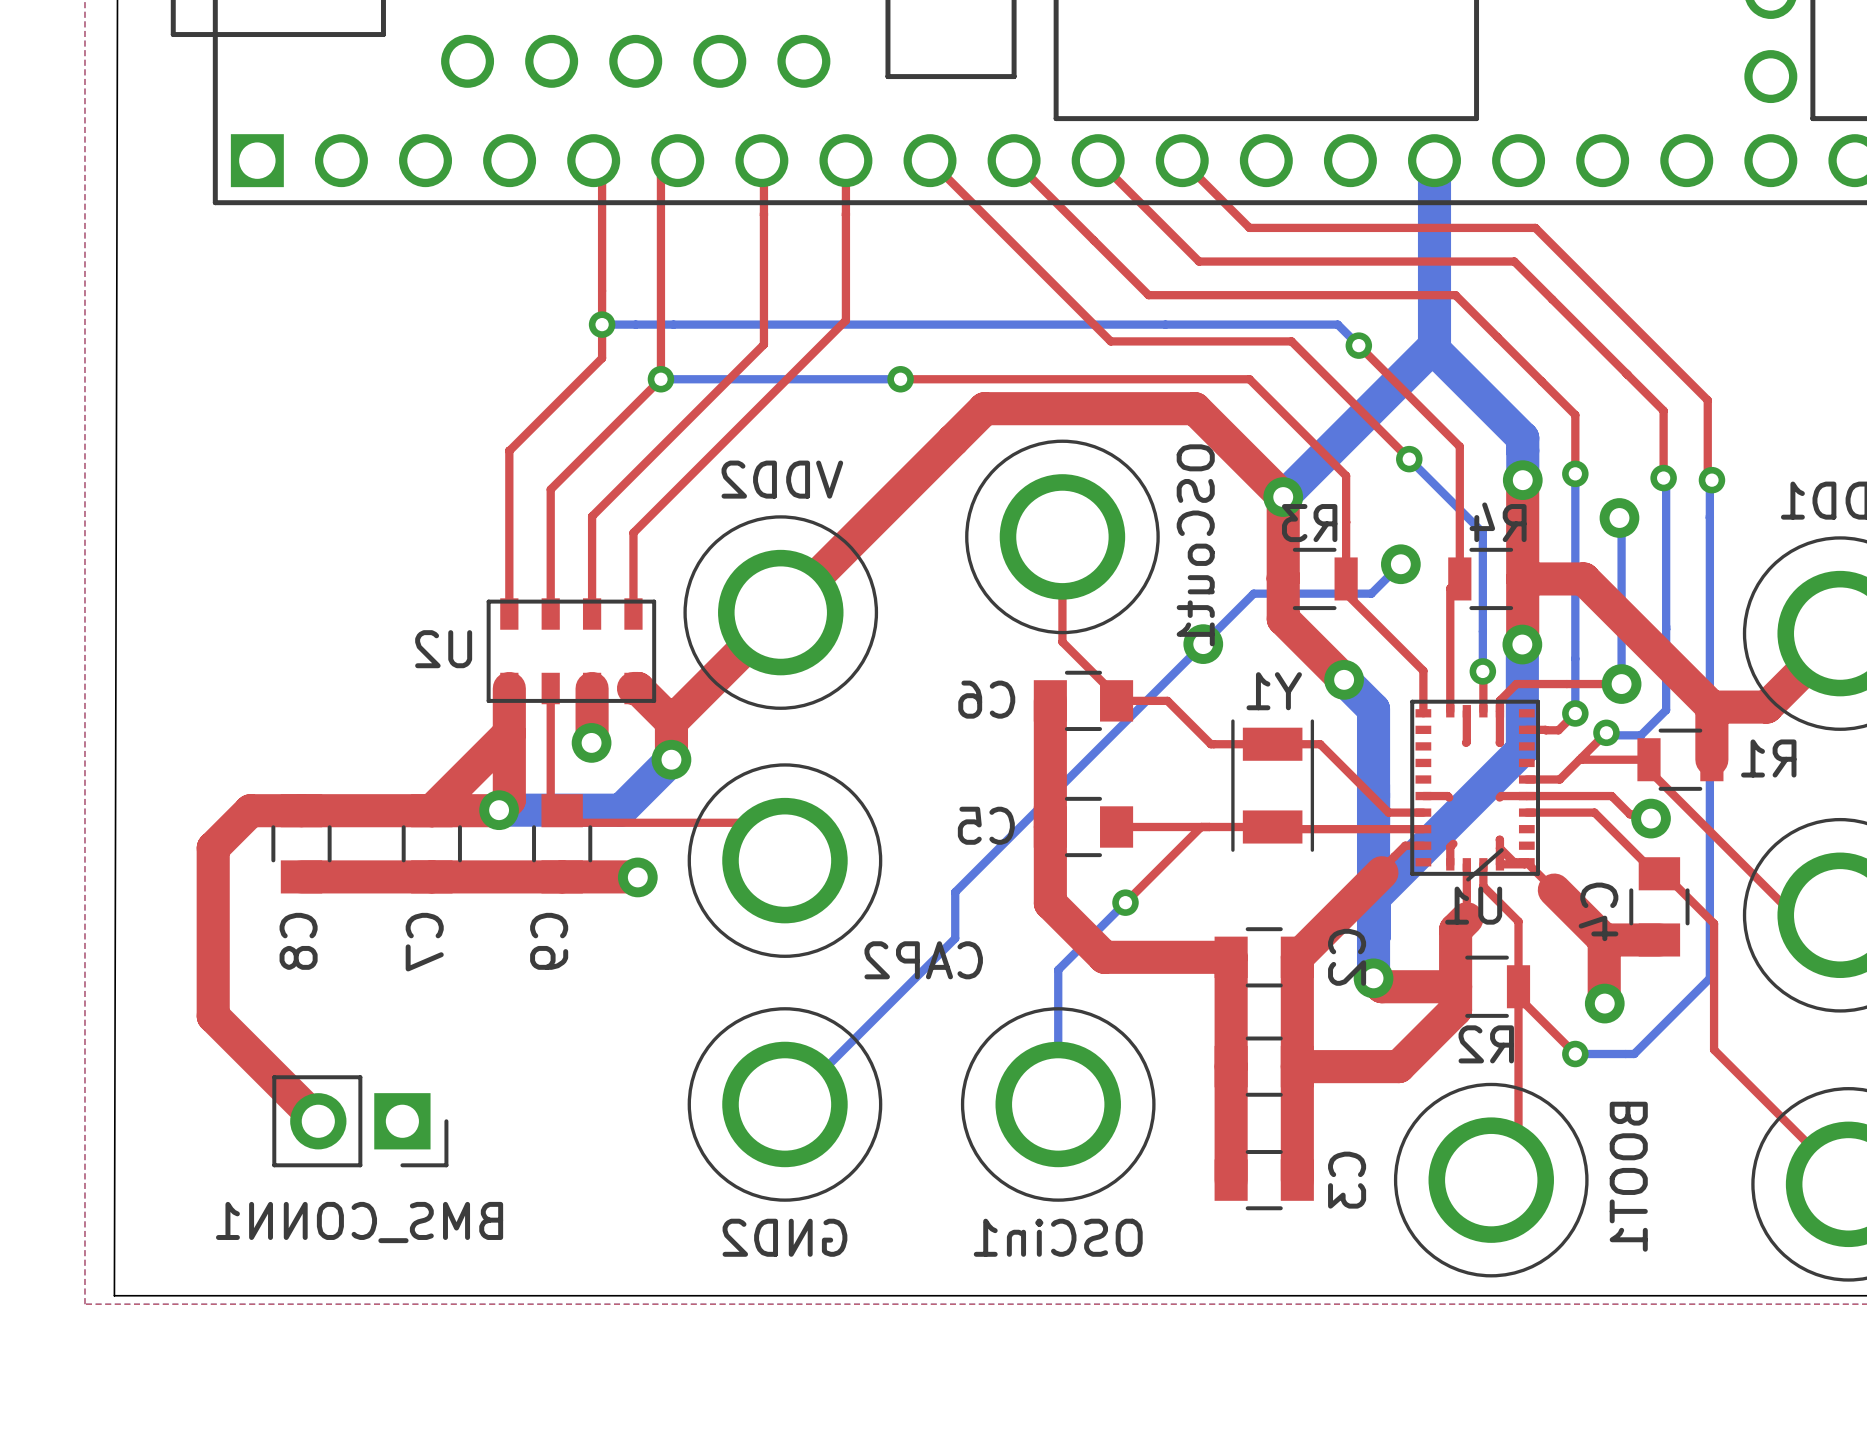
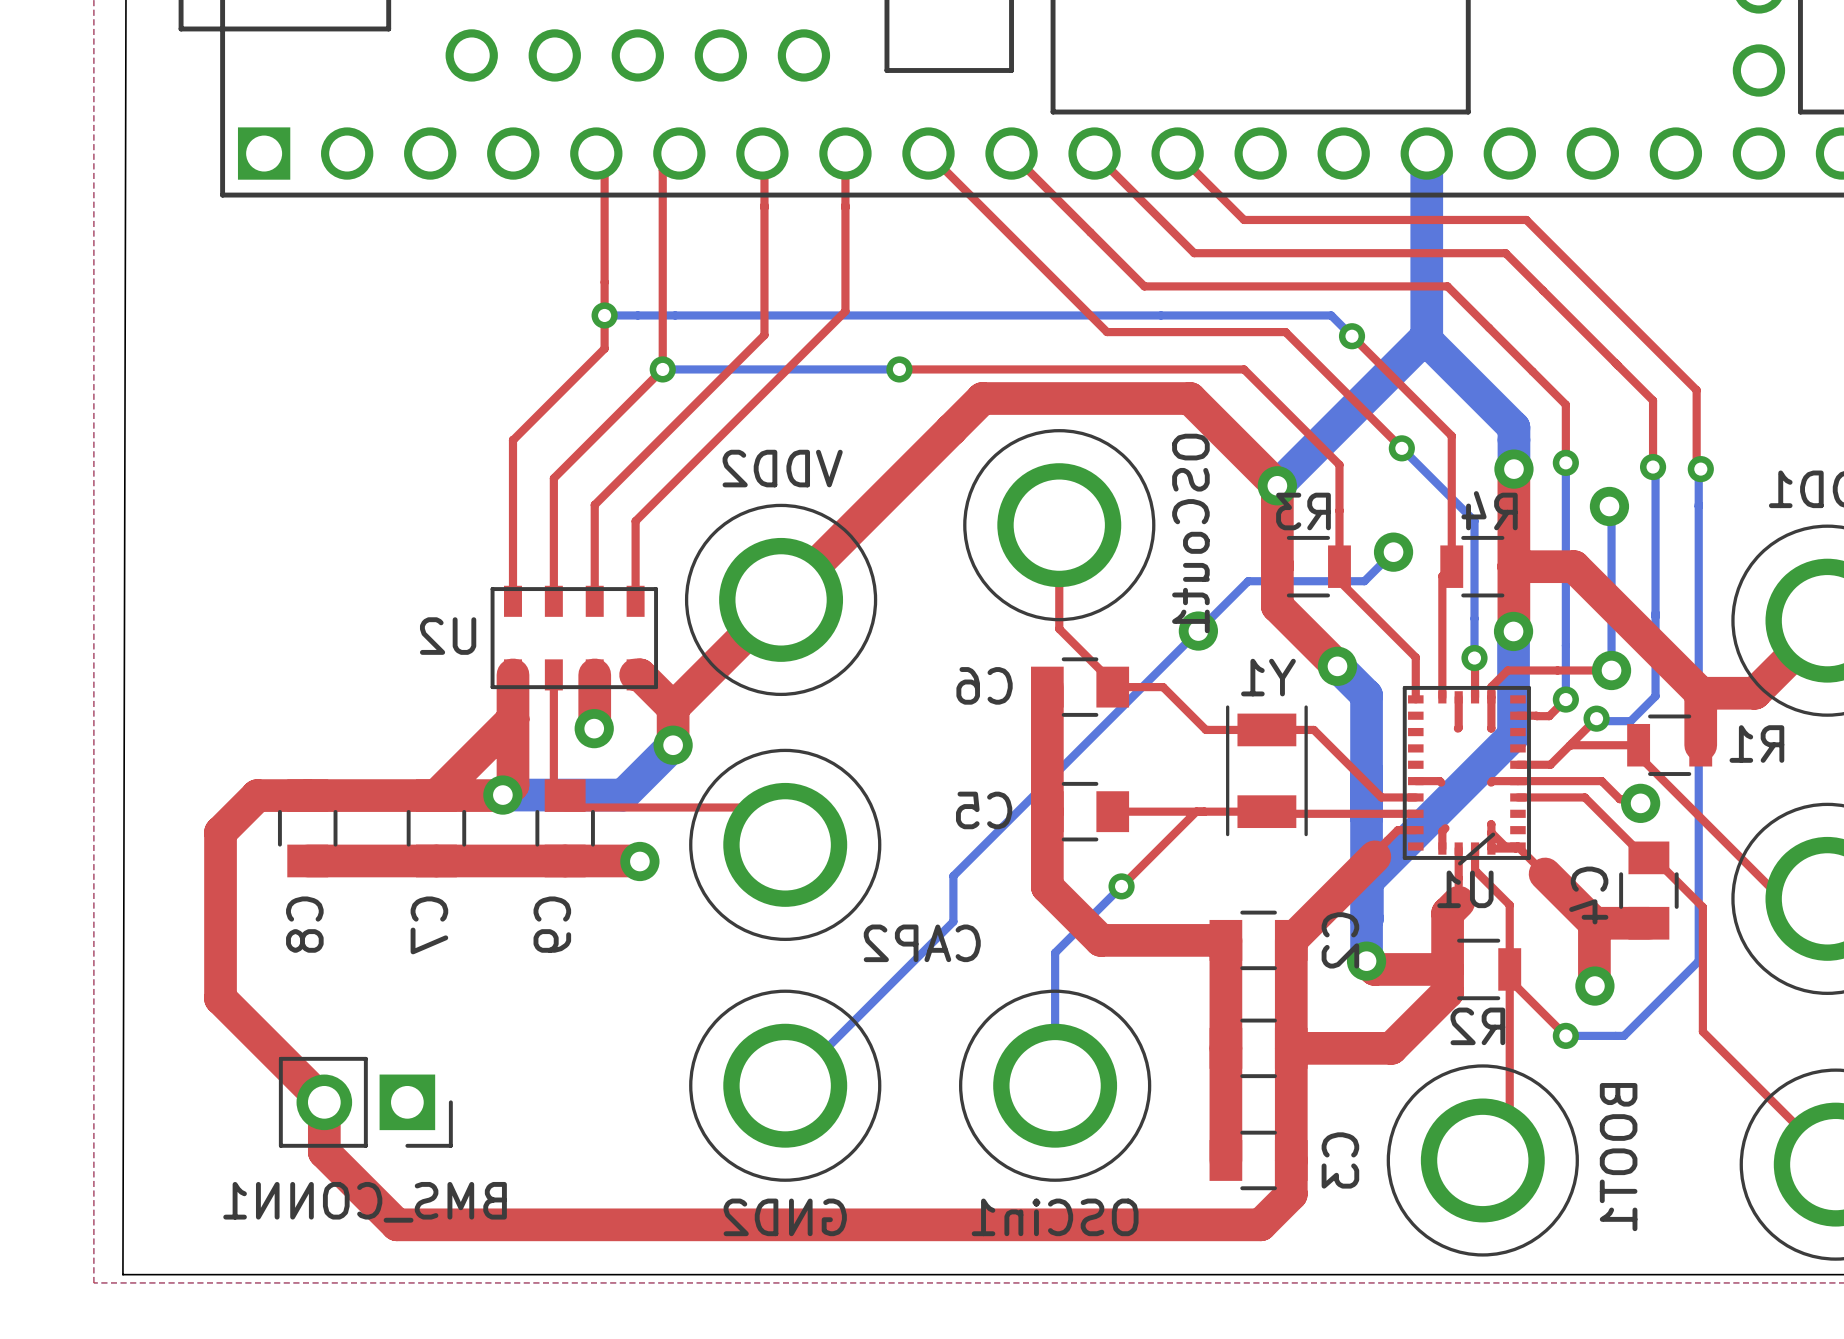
top track: none -> (324, 1102) (324, 1152) (396, 1224) (1260, 1224) (1291, 1194) (1291, 1160)

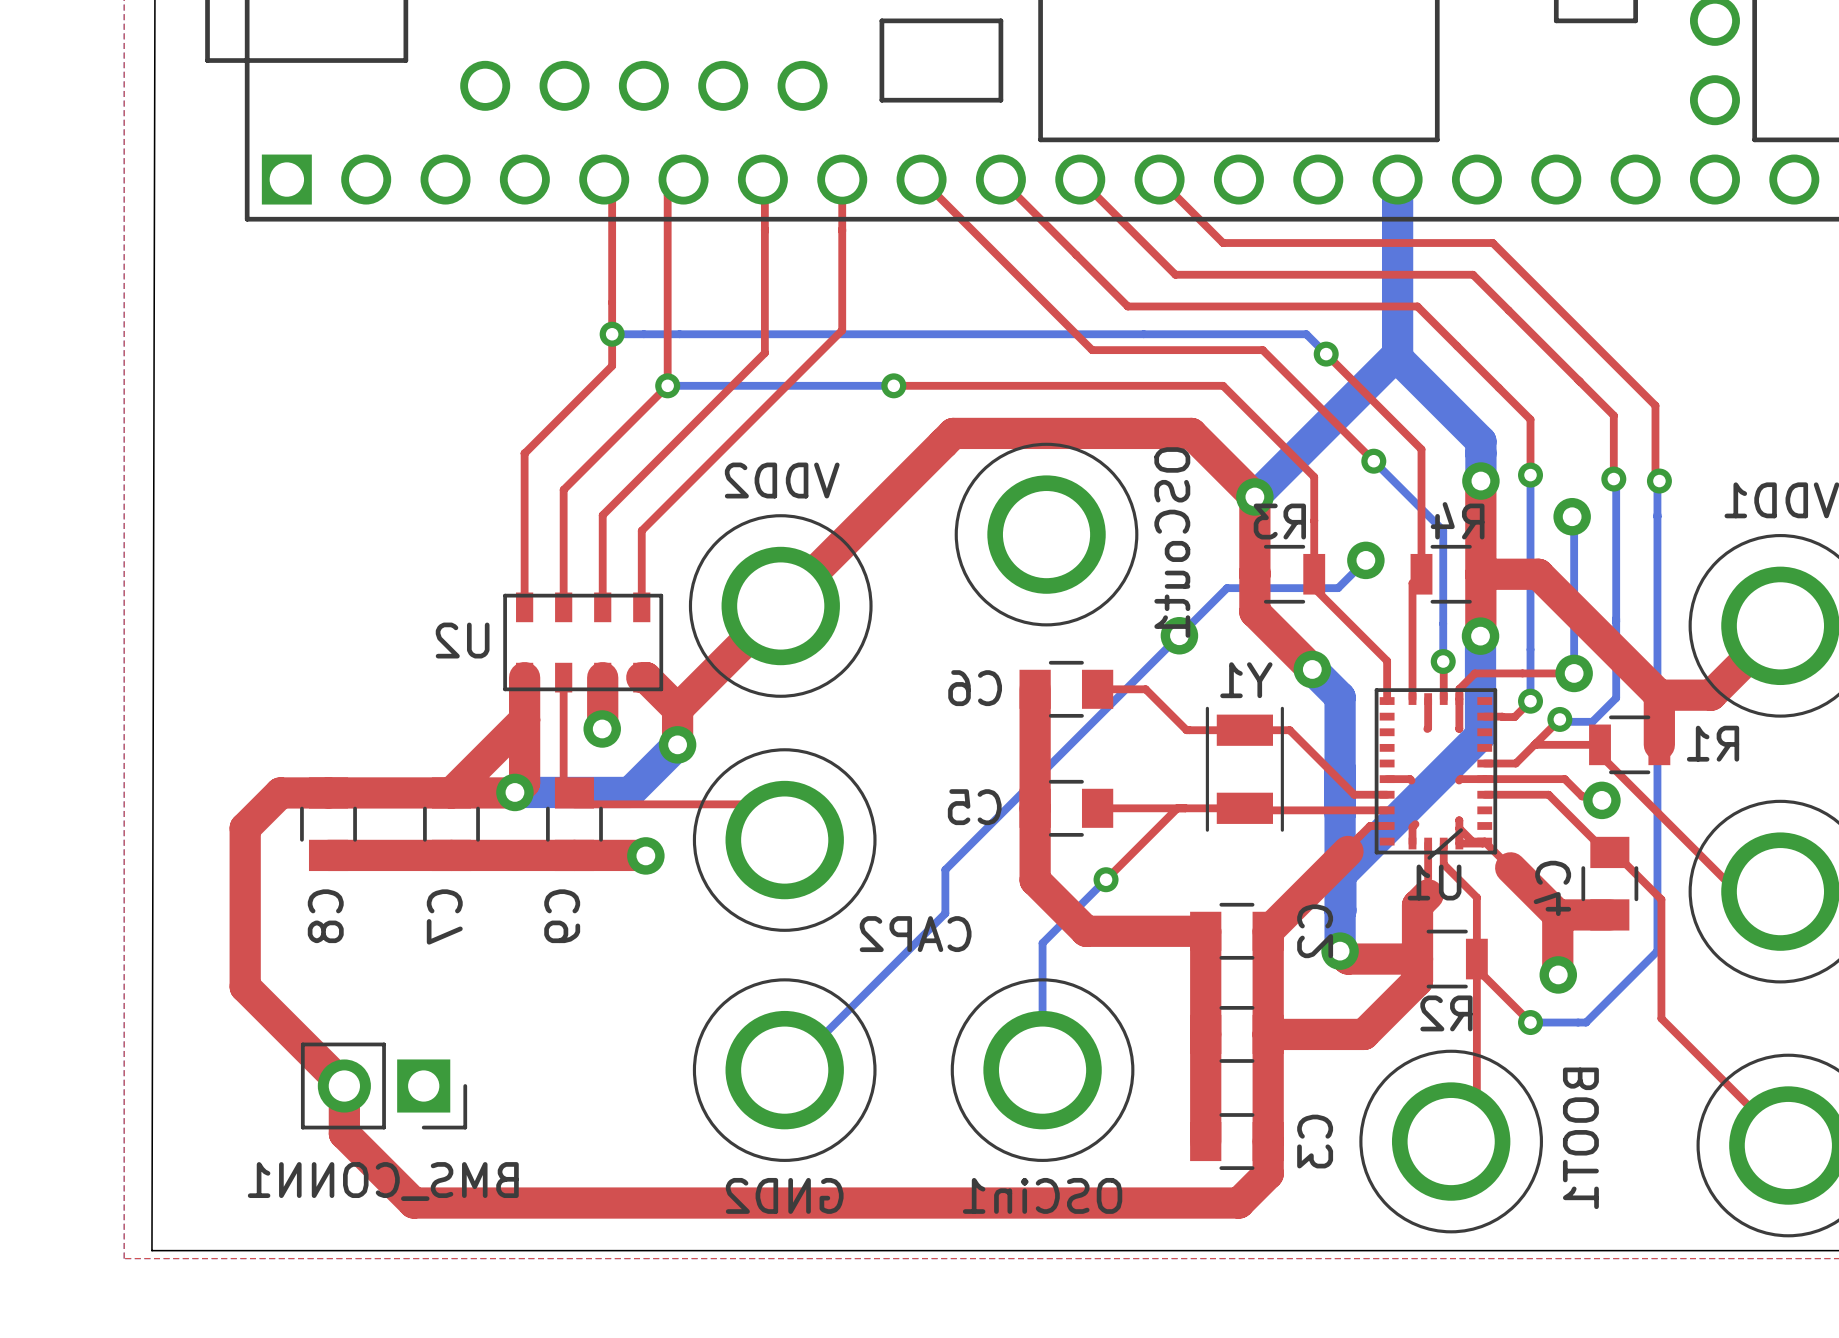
top track: (961, 419) (982, 398) (1190, 398) (1210, 419) -> (953, 433) (1191, 433)
top track: (1059, 525) (1059, 628) (1112, 682) -> none

